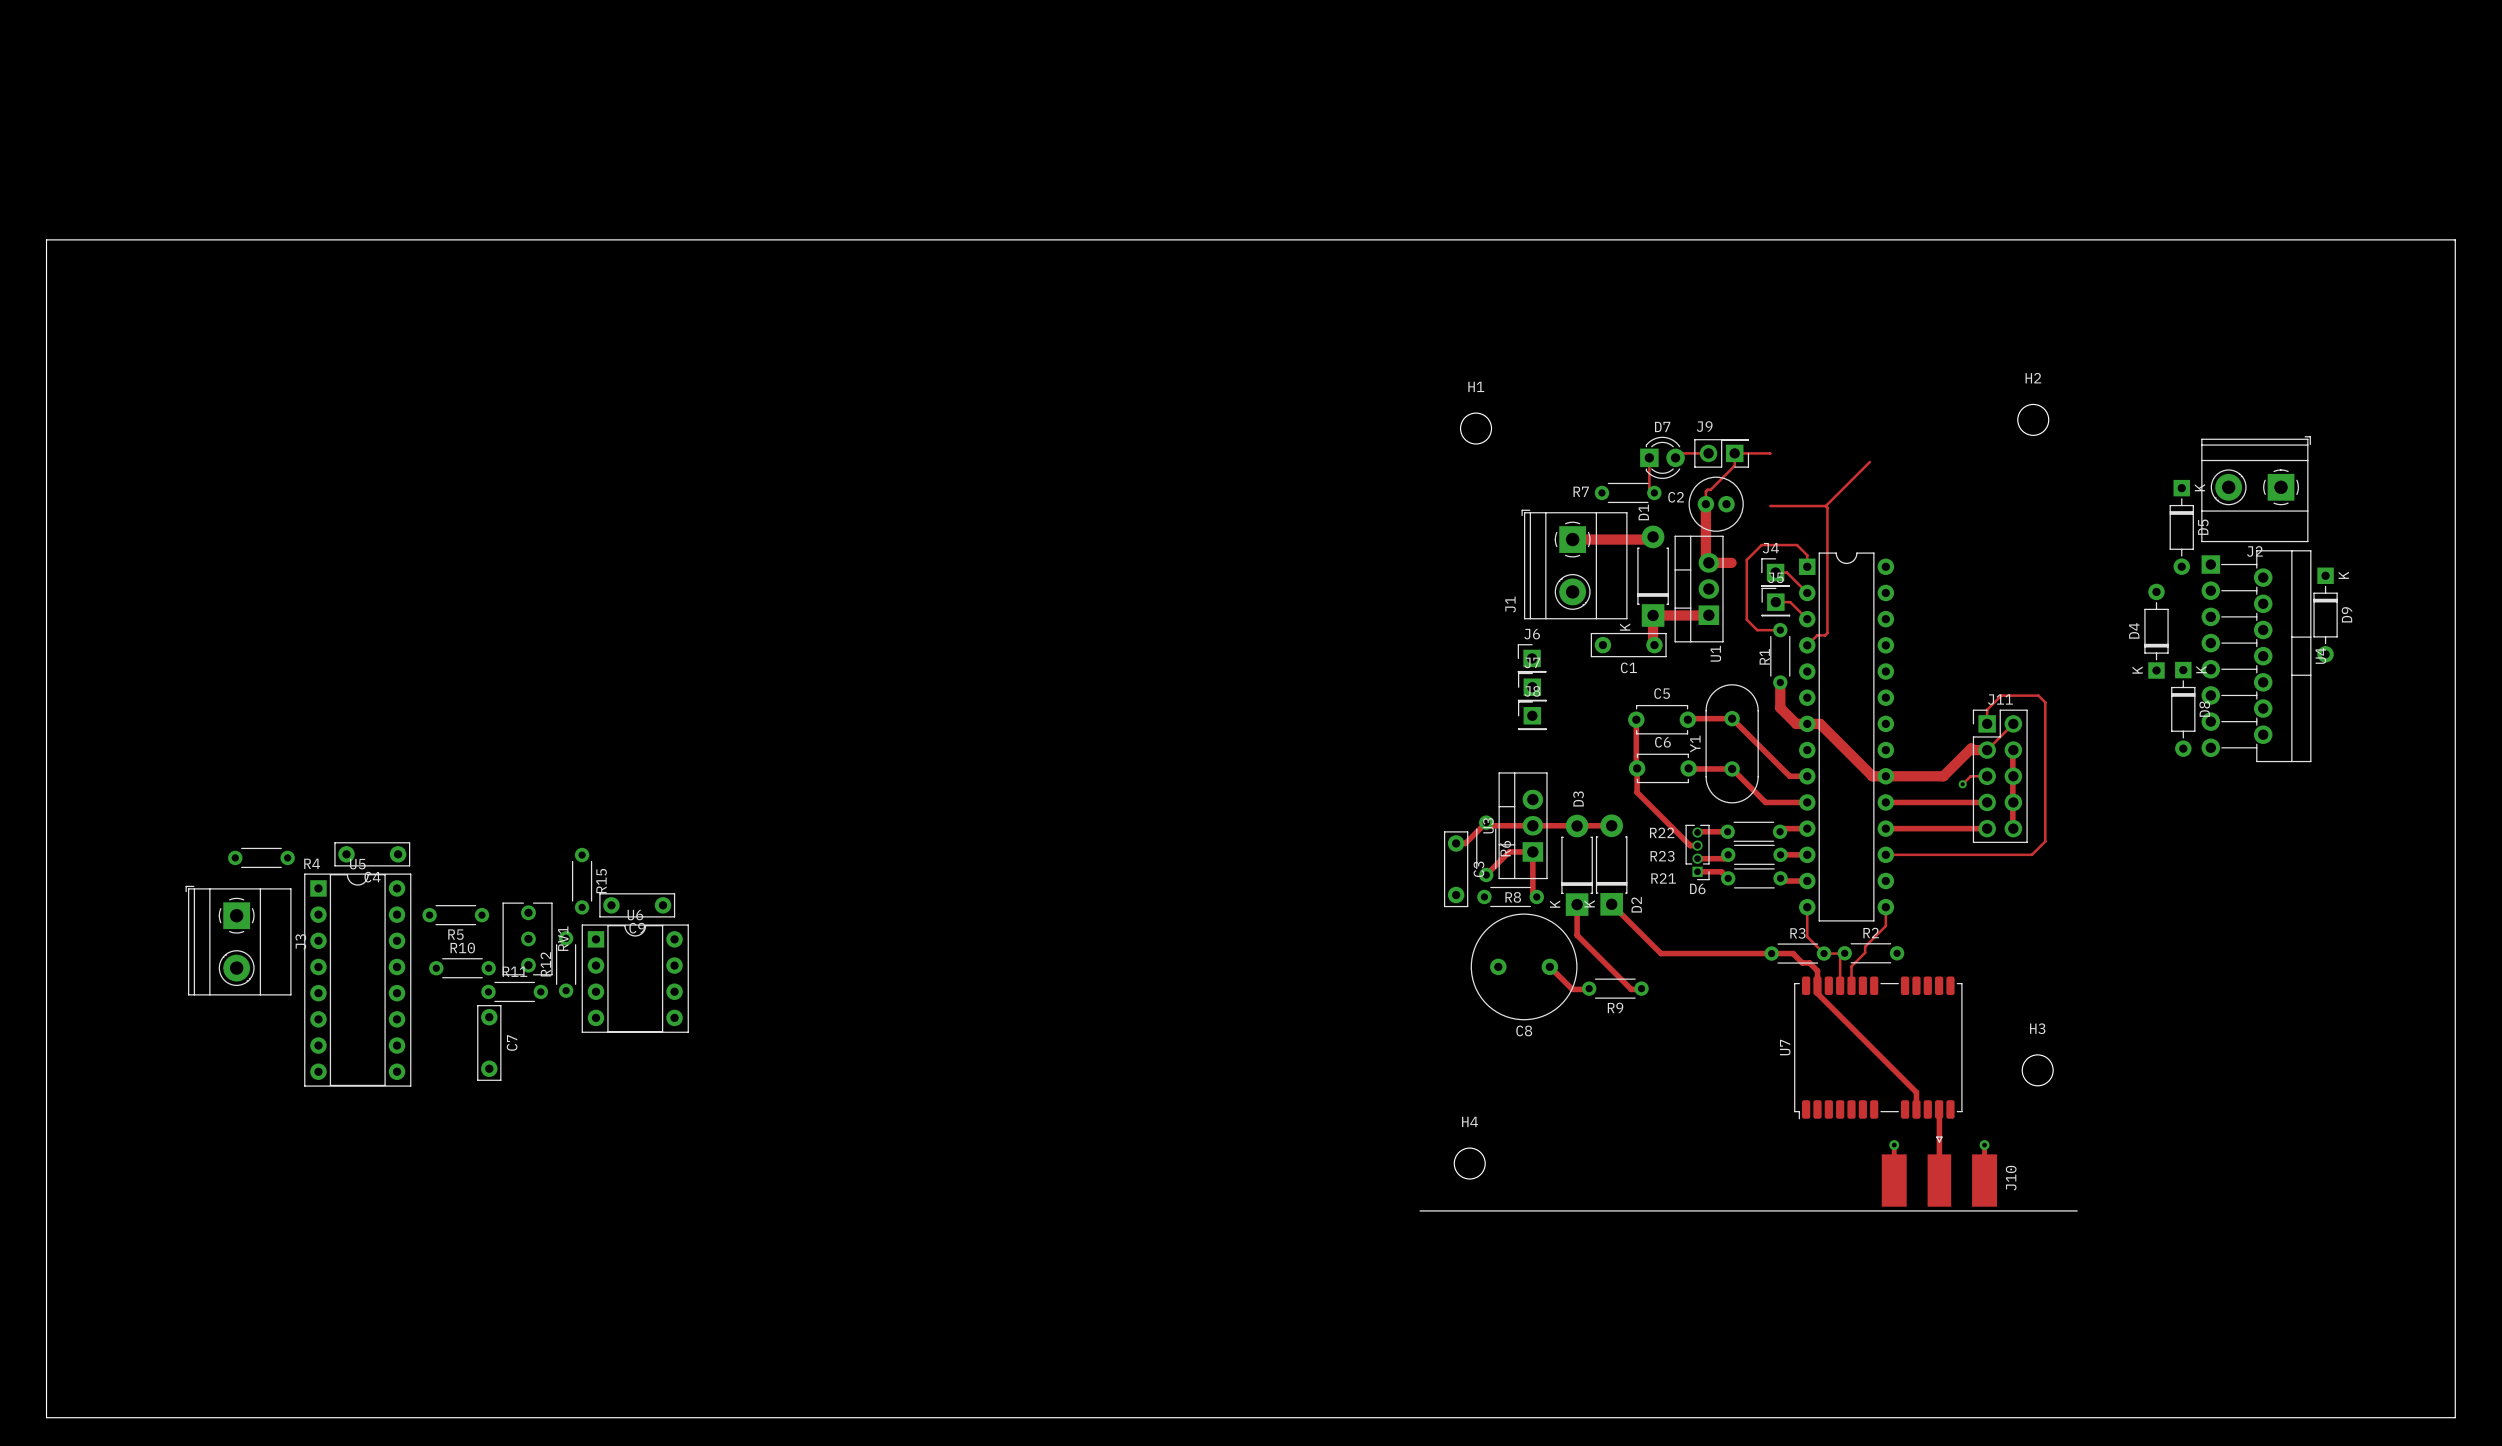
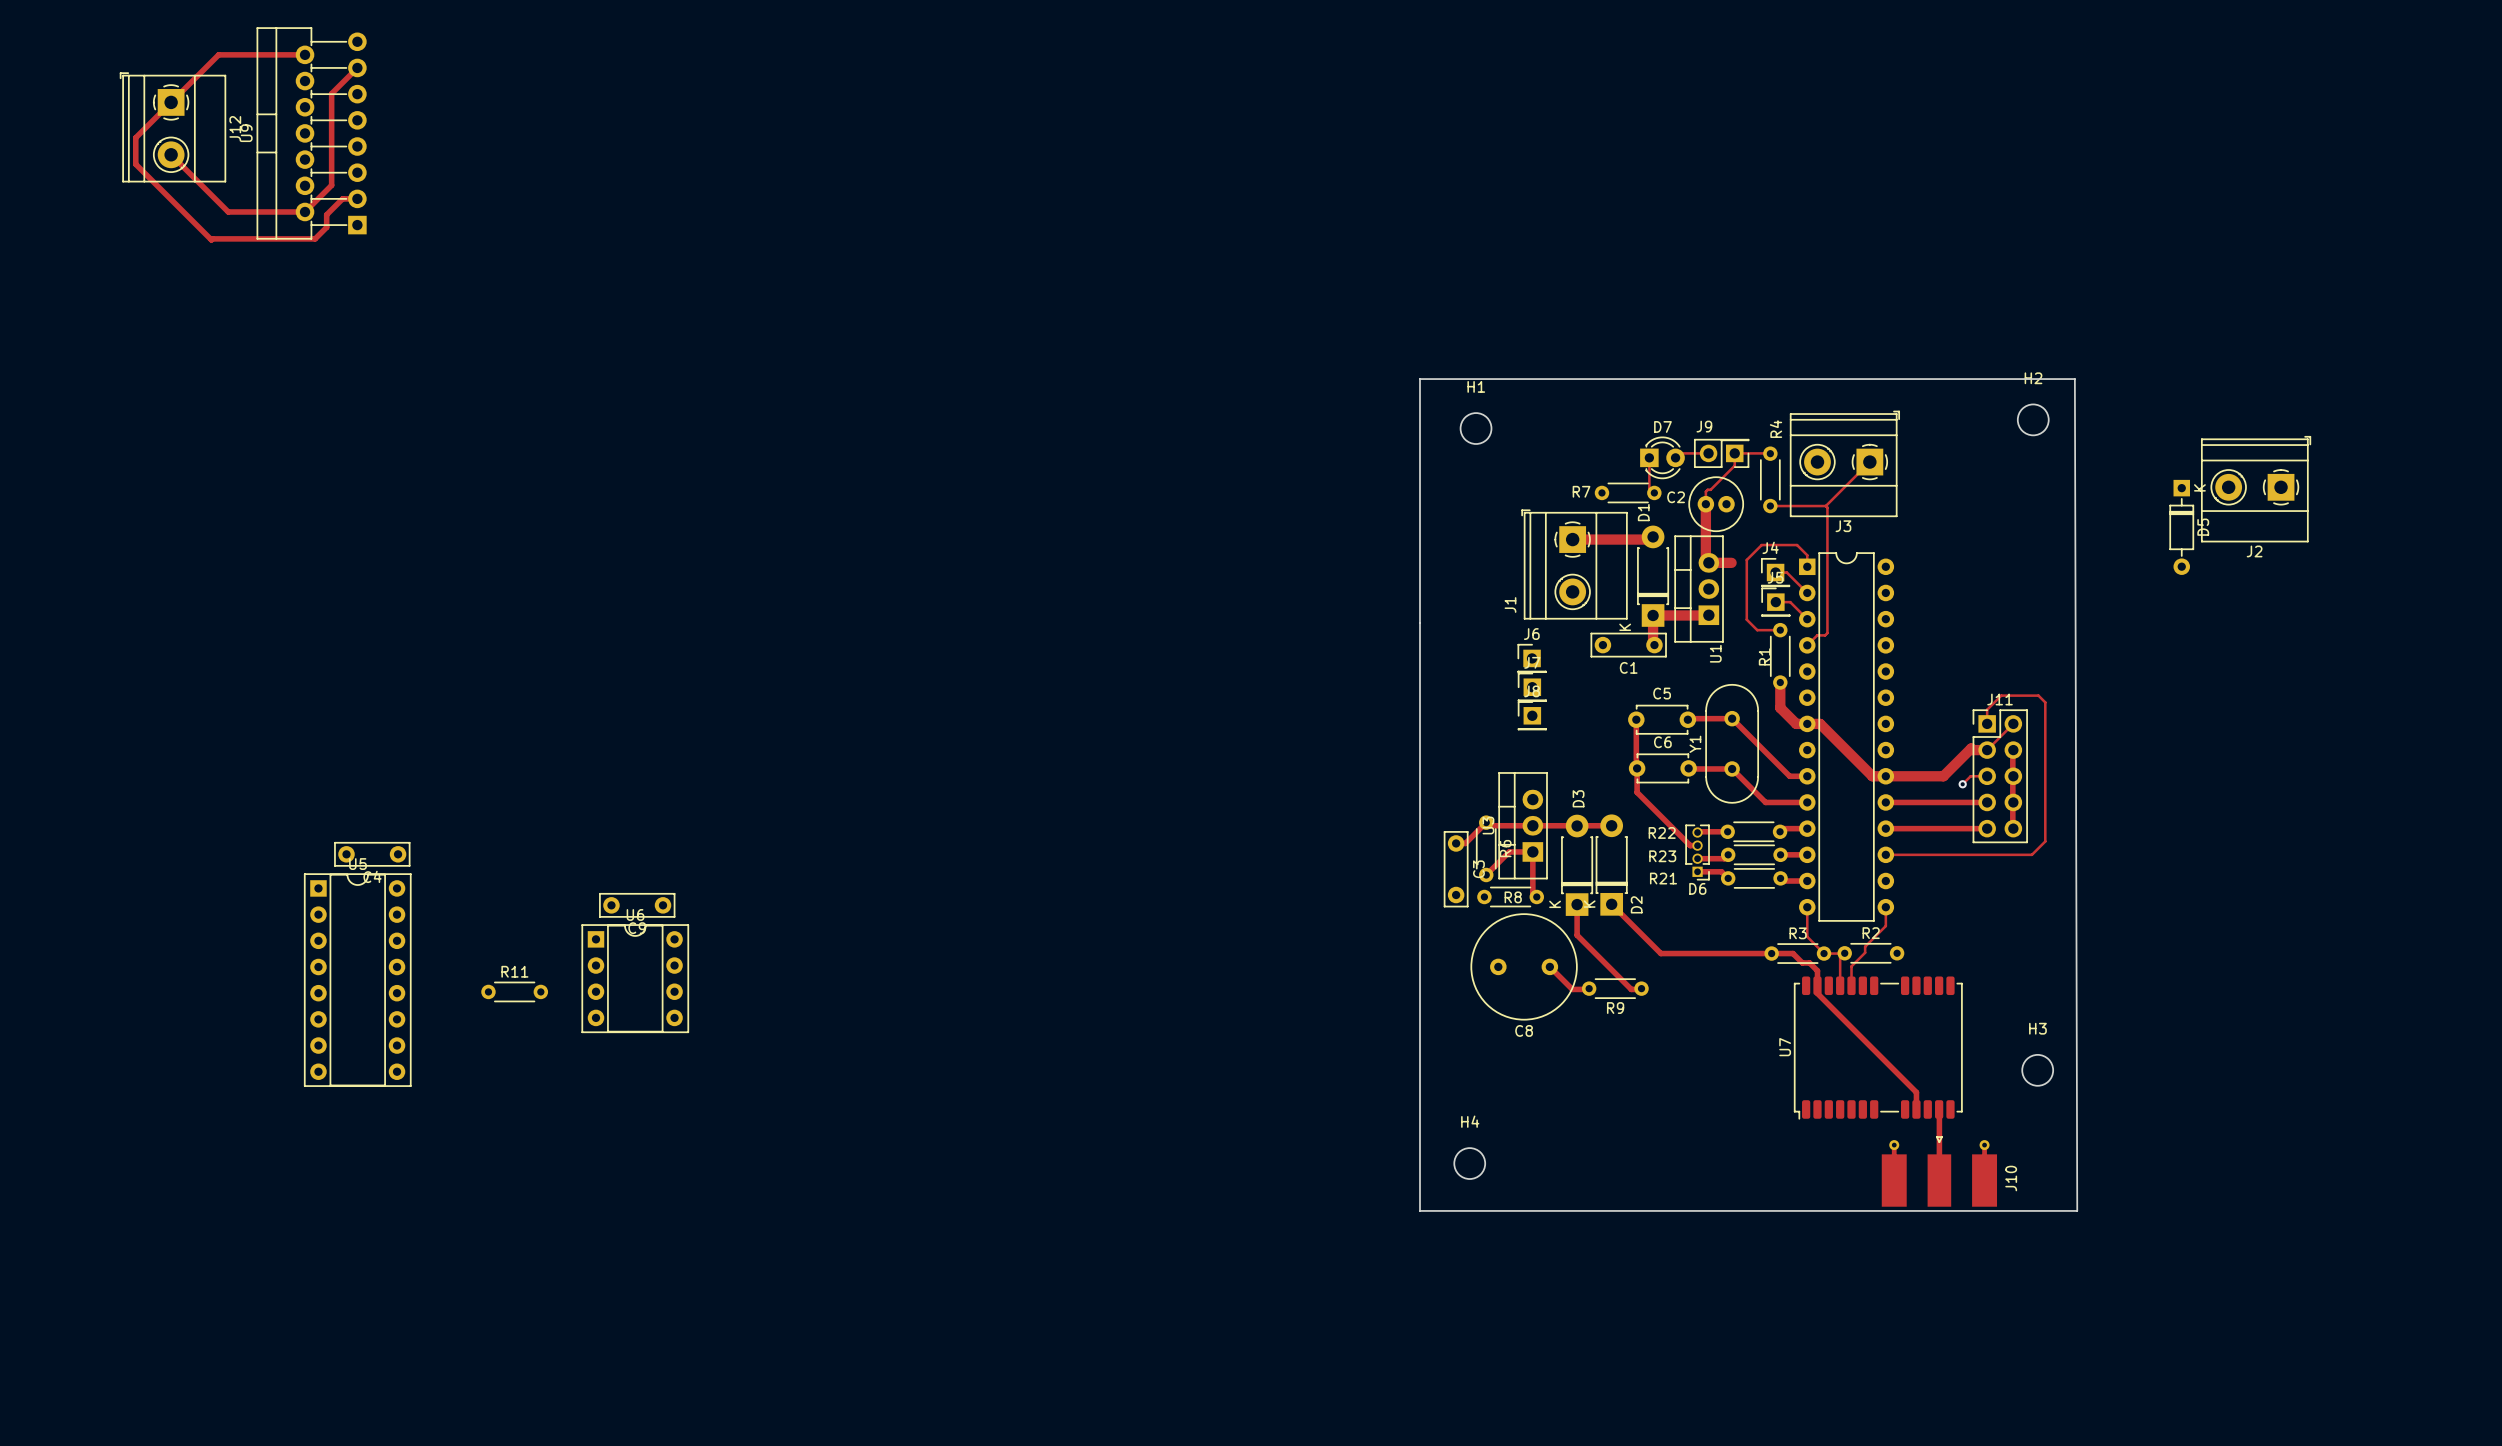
track: none -> (305, 54) (218, 54) (135, 137) (135, 164) (211, 239) (315, 238) (326, 227) (326, 214) (342, 198) (357, 198)
track: none -> (357, 67) (331, 93) (331, 185) (305, 211) (228, 211) (171, 154)
J12: none -> (172, 127)
U9: none -> (311, 133)
board edge: (46, 239) (2455, 239) (2455, 1417) (46, 1417) (46, 239) -> none
D9: (2325, 615) -> none
D4: (2156, 631) -> none
U4: (2256, 656) -> none
D8: (2183, 709) -> none
R4 rotation: 0° (261, 857) -> 90° clockwise (1770, 479)
R4 position: (261, 857) -> (1770, 479)
R4 name position: R4 (312, 863) -> R4 (1776, 429)
R15: (582, 881) -> none
R5: (455, 915) -> none
RV1: (527, 938) -> none
J3 rotation: 0° (238, 940) -> 90° clockwise (1844, 463)
J3 position: (238, 940) -> (1844, 463)
R12: (566, 964) -> none
R10: (462, 968) -> none
C7: (489, 1042) -> none
board edge: none -> (1419, 1210) (1419, 379) (2074, 379) (2077, 1210)

